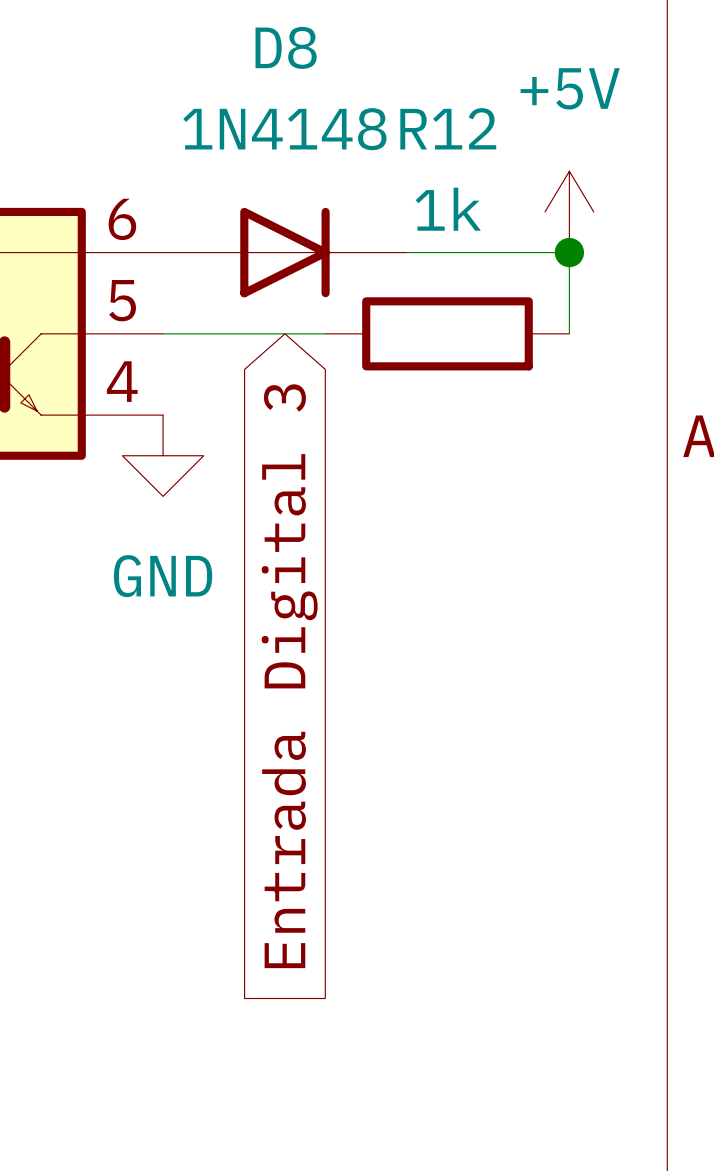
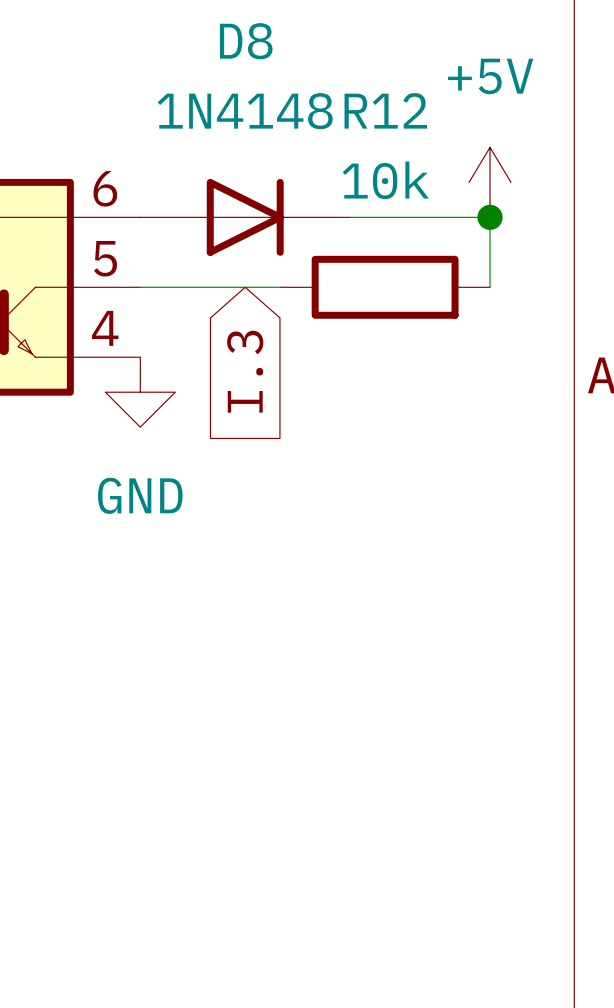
R12 value: 1k (448, 209) -> 10k (385, 180)
global label: Entrada Digital 3 (289, 676) -> I.3 (245, 371)

